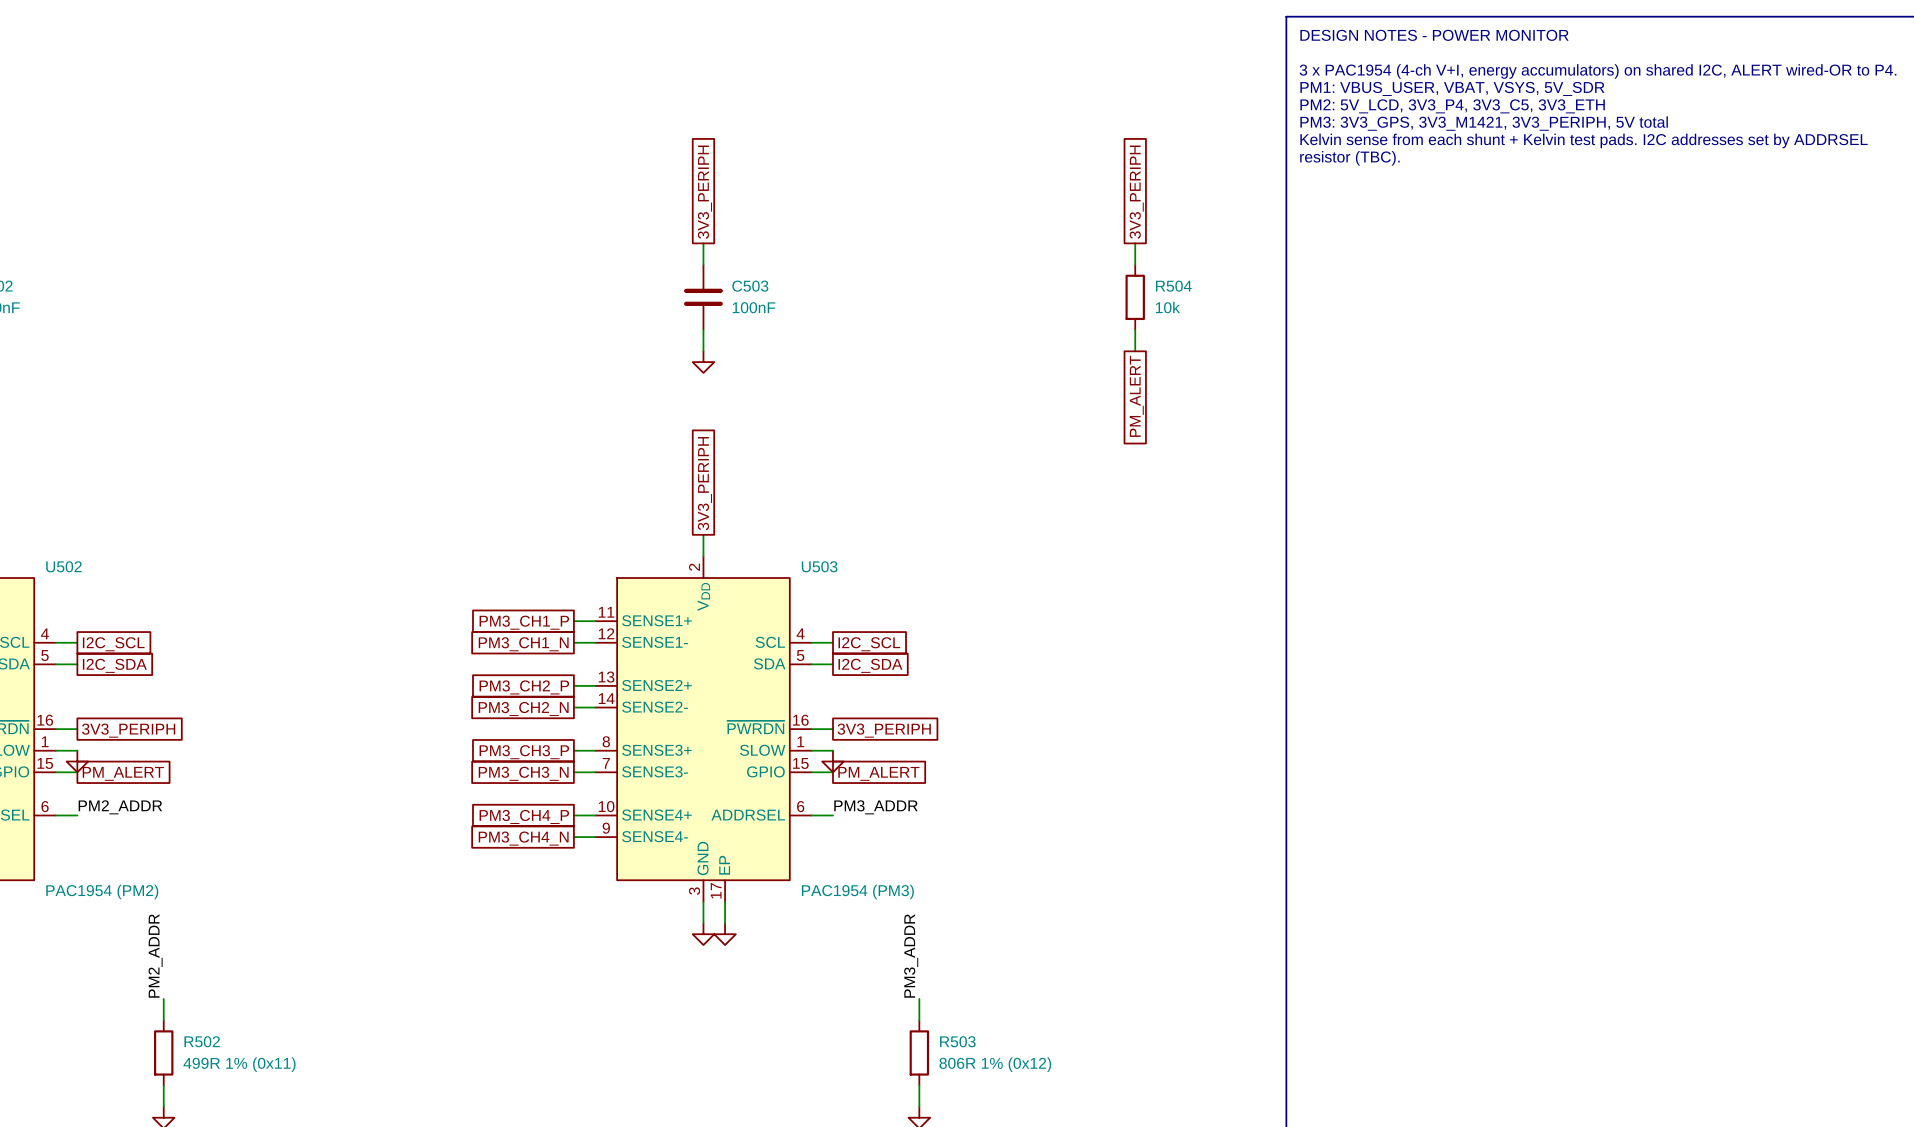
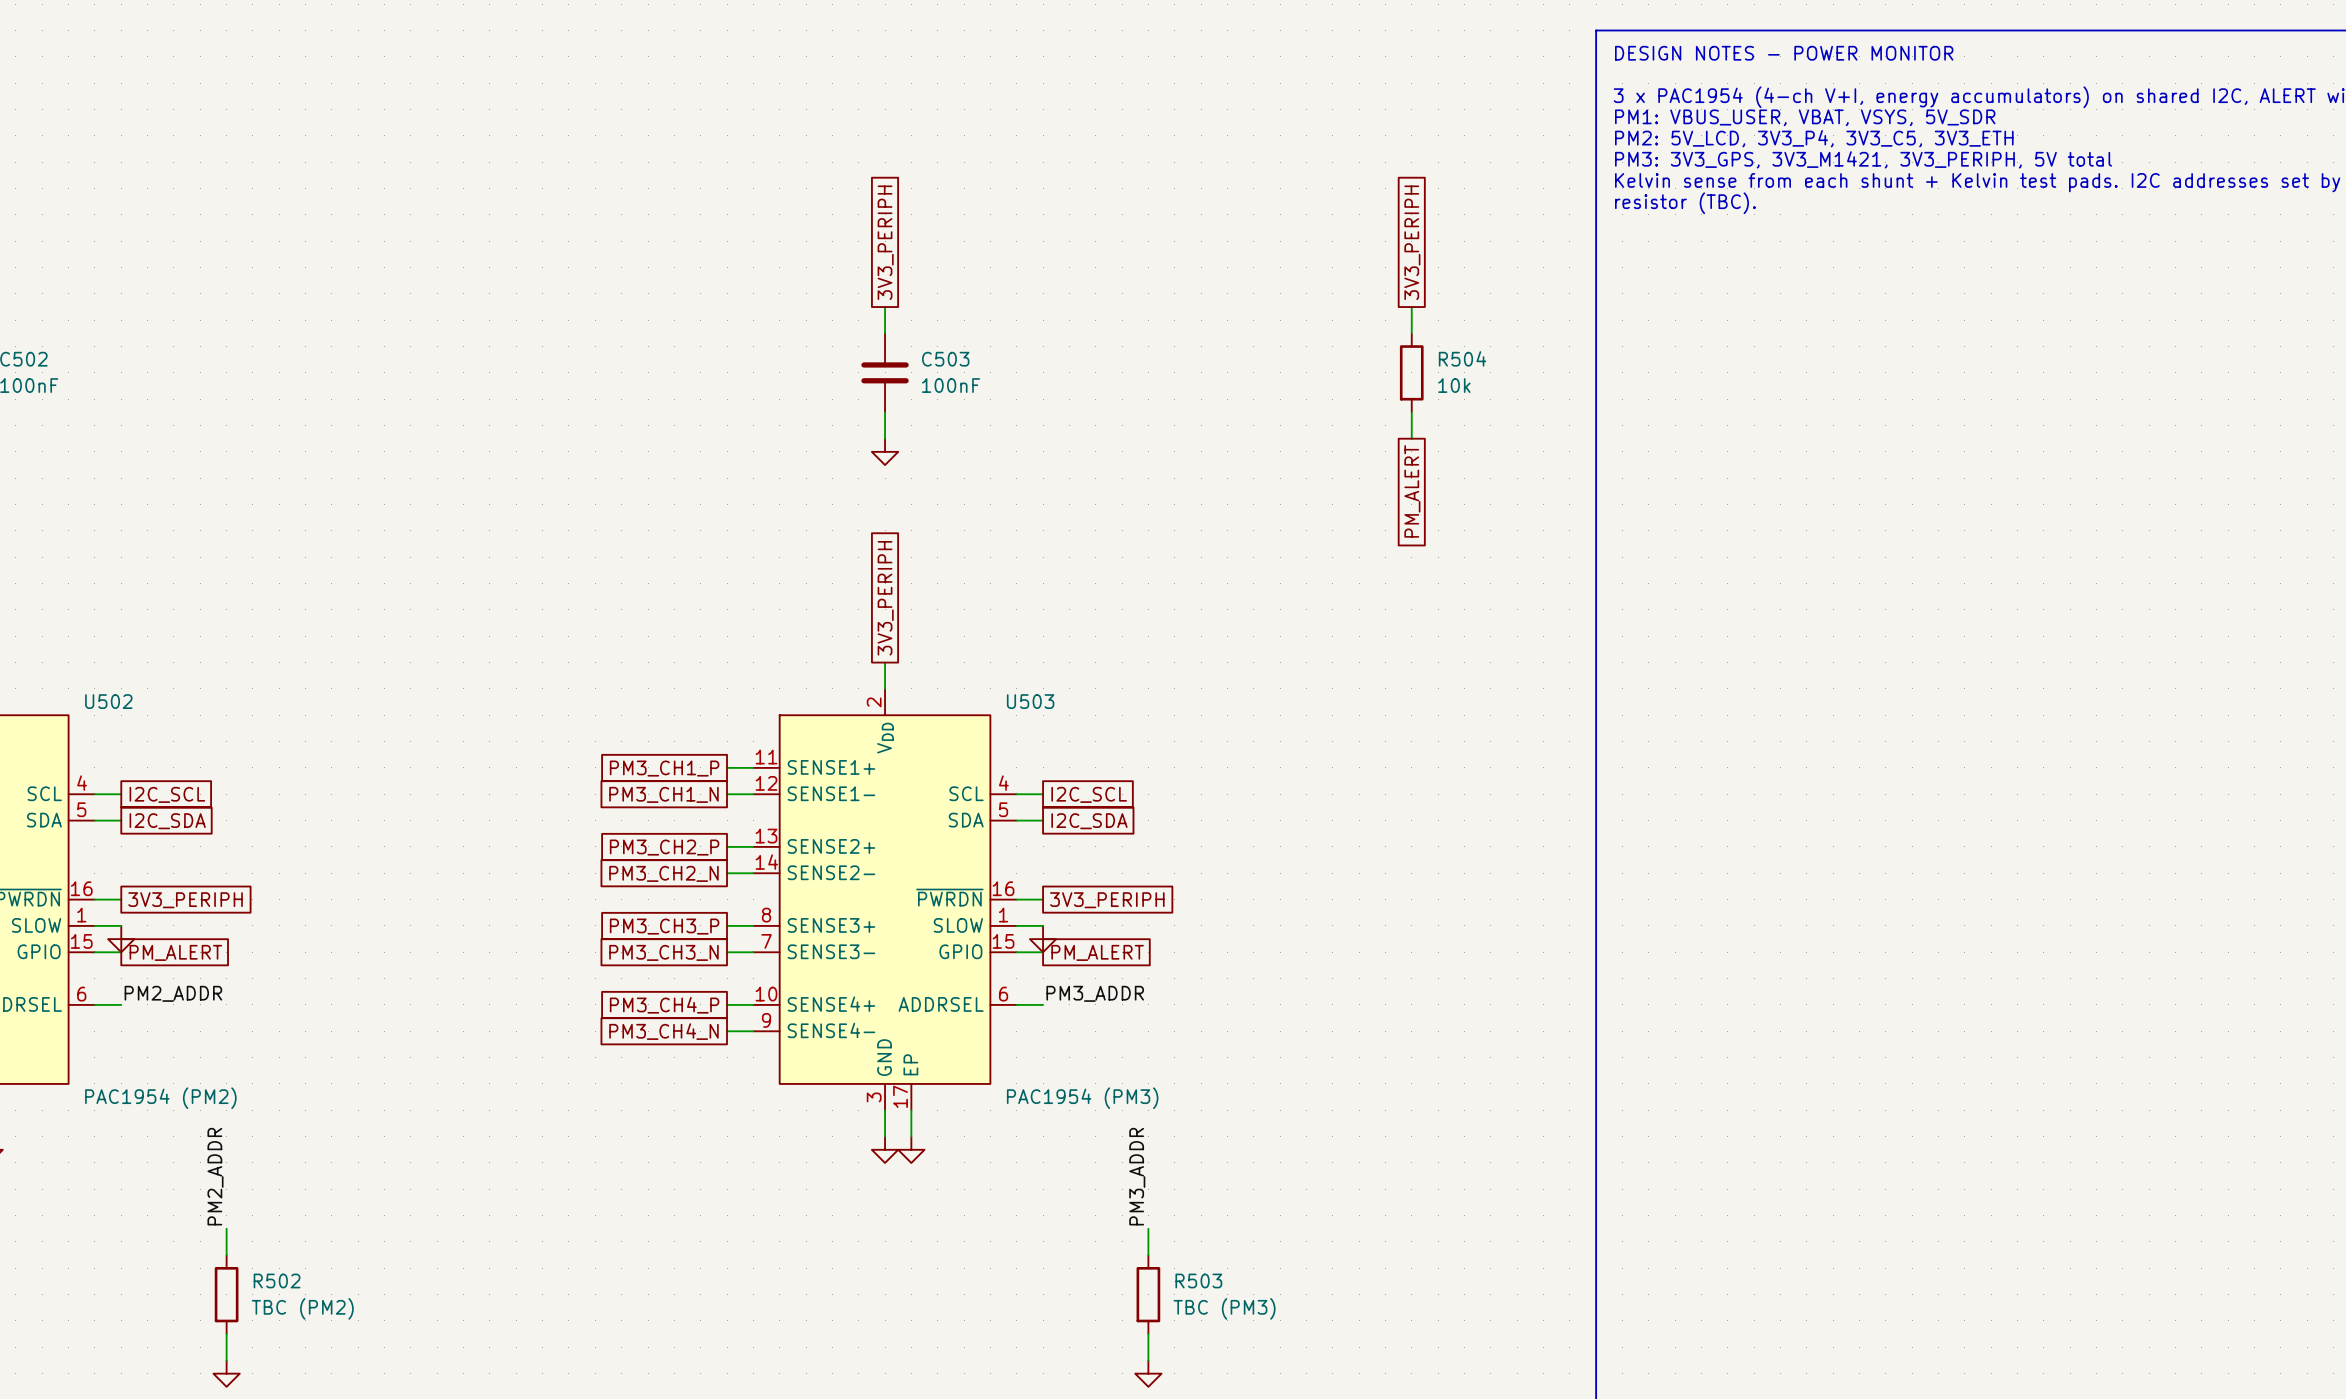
R502 value: 499R 1% (0x11) (239, 1064) -> TBC (PM2) (302, 1308)
R503 value: 806R 1% (0x12) (995, 1064) -> TBC (PM3) (1224, 1308)

